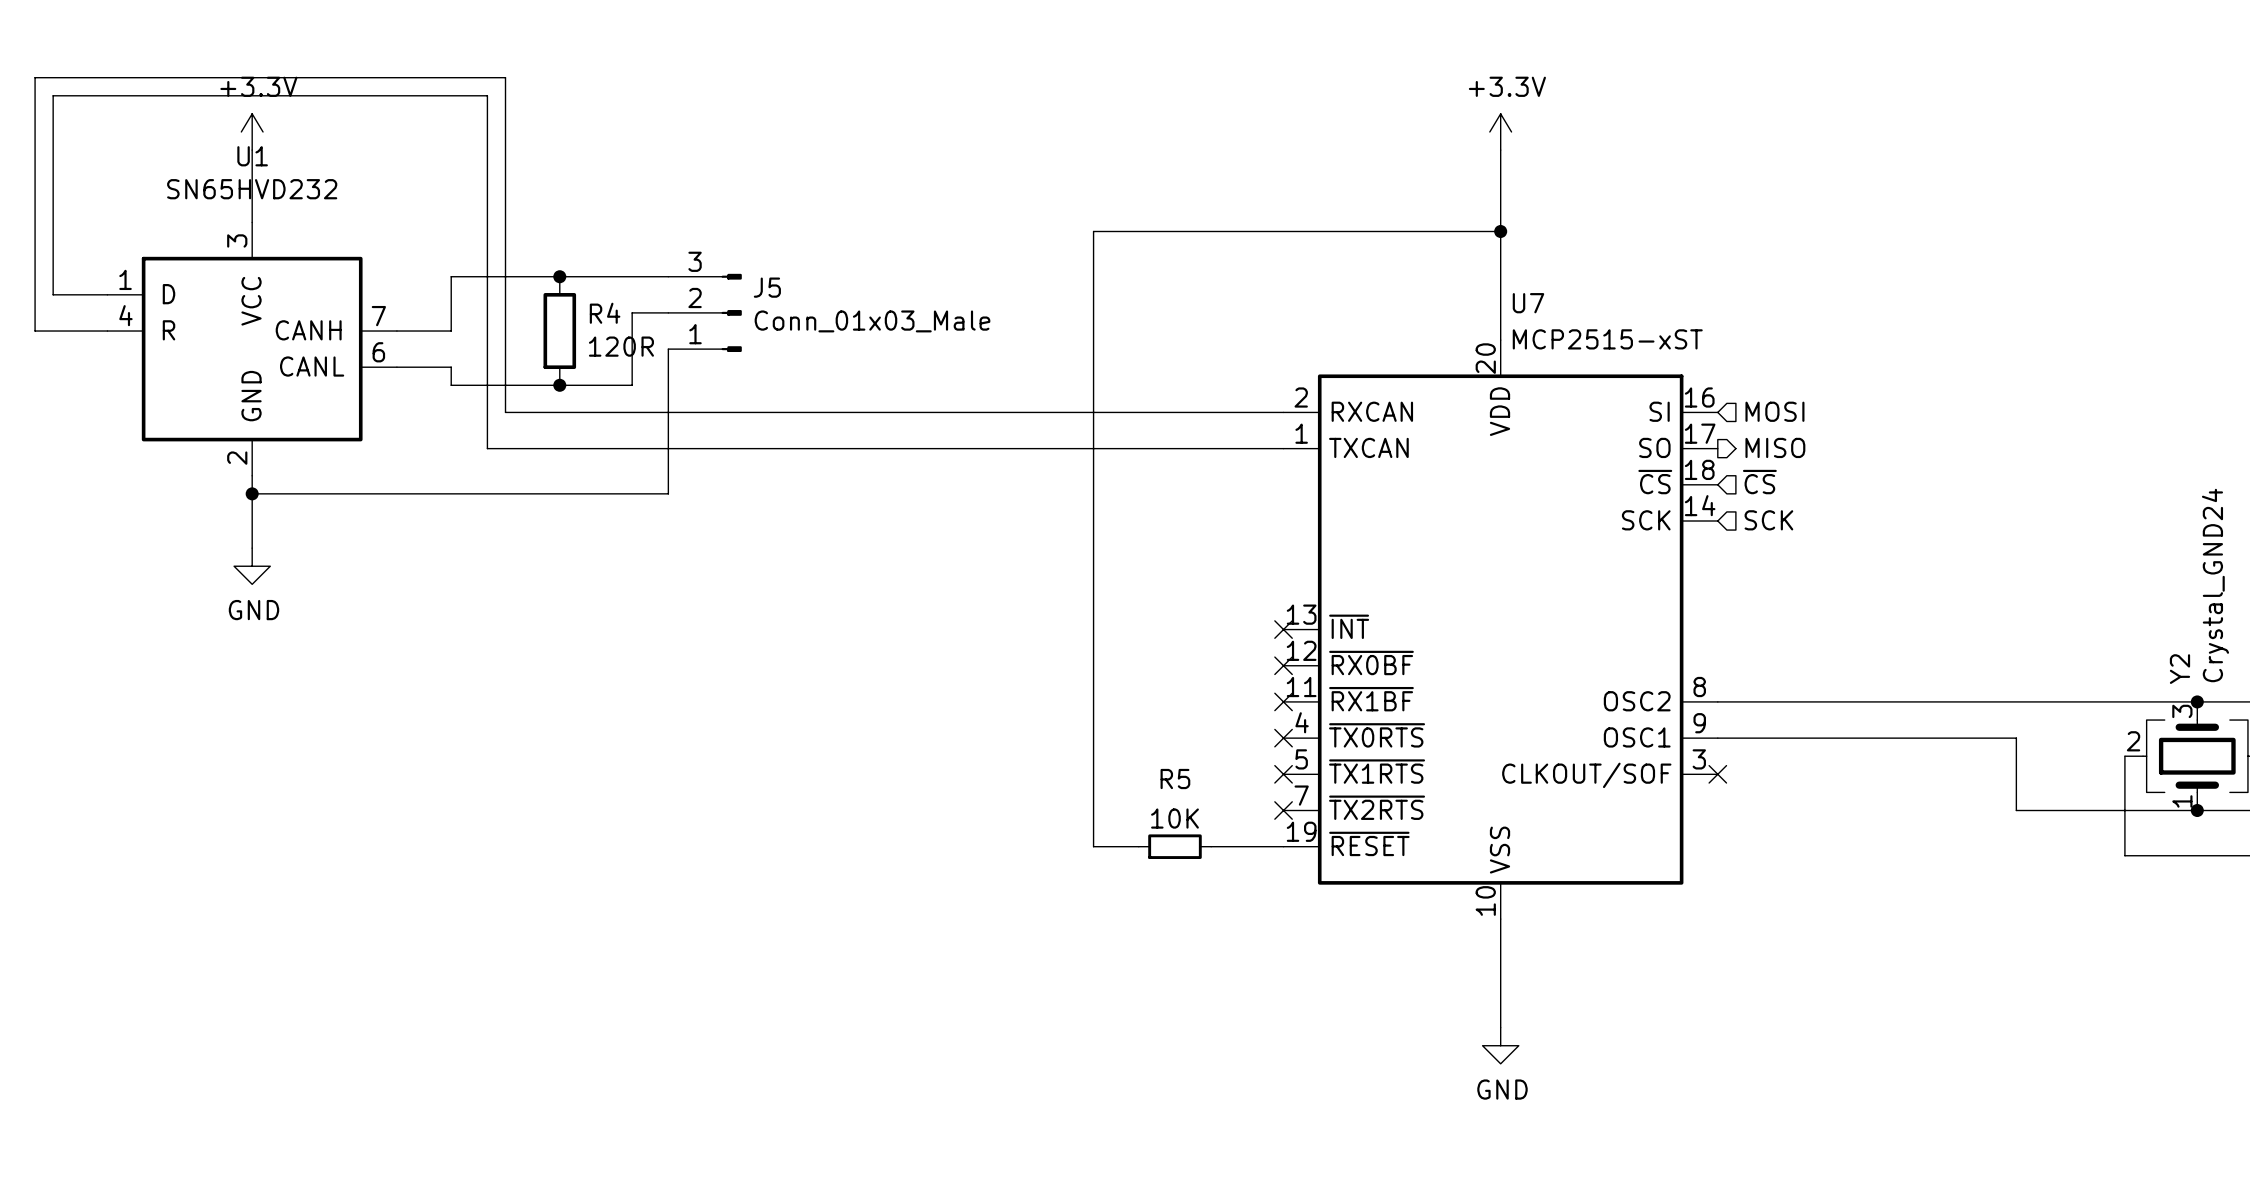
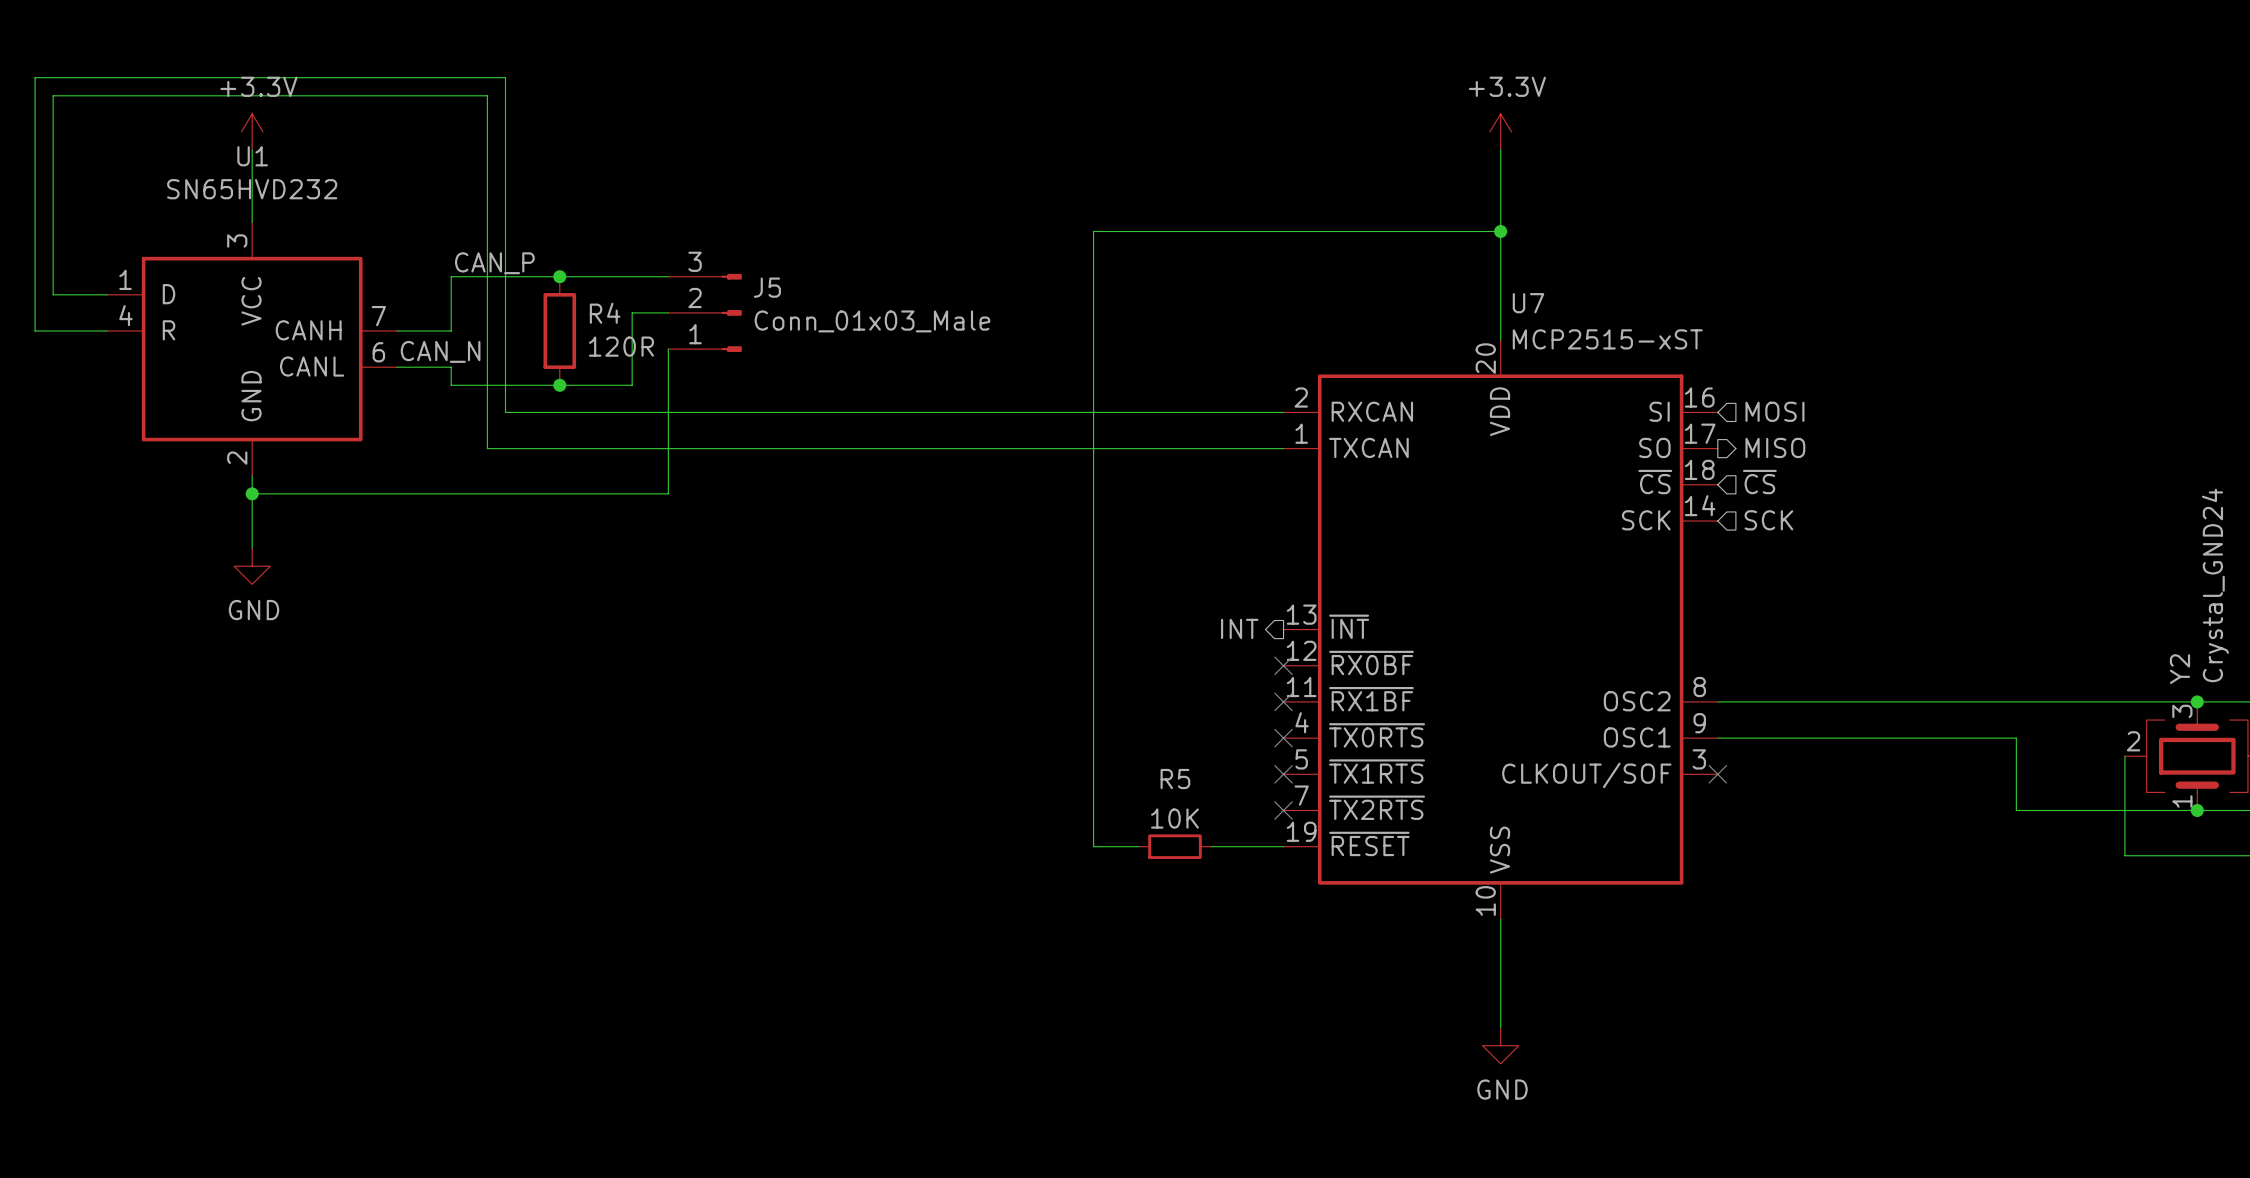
label: none -> CAN_P (494, 263)
label: none -> CAN_N (440, 351)
hierarchical label: none -> INT (1239, 628)
no-connect mark: (1283, 629) -> none

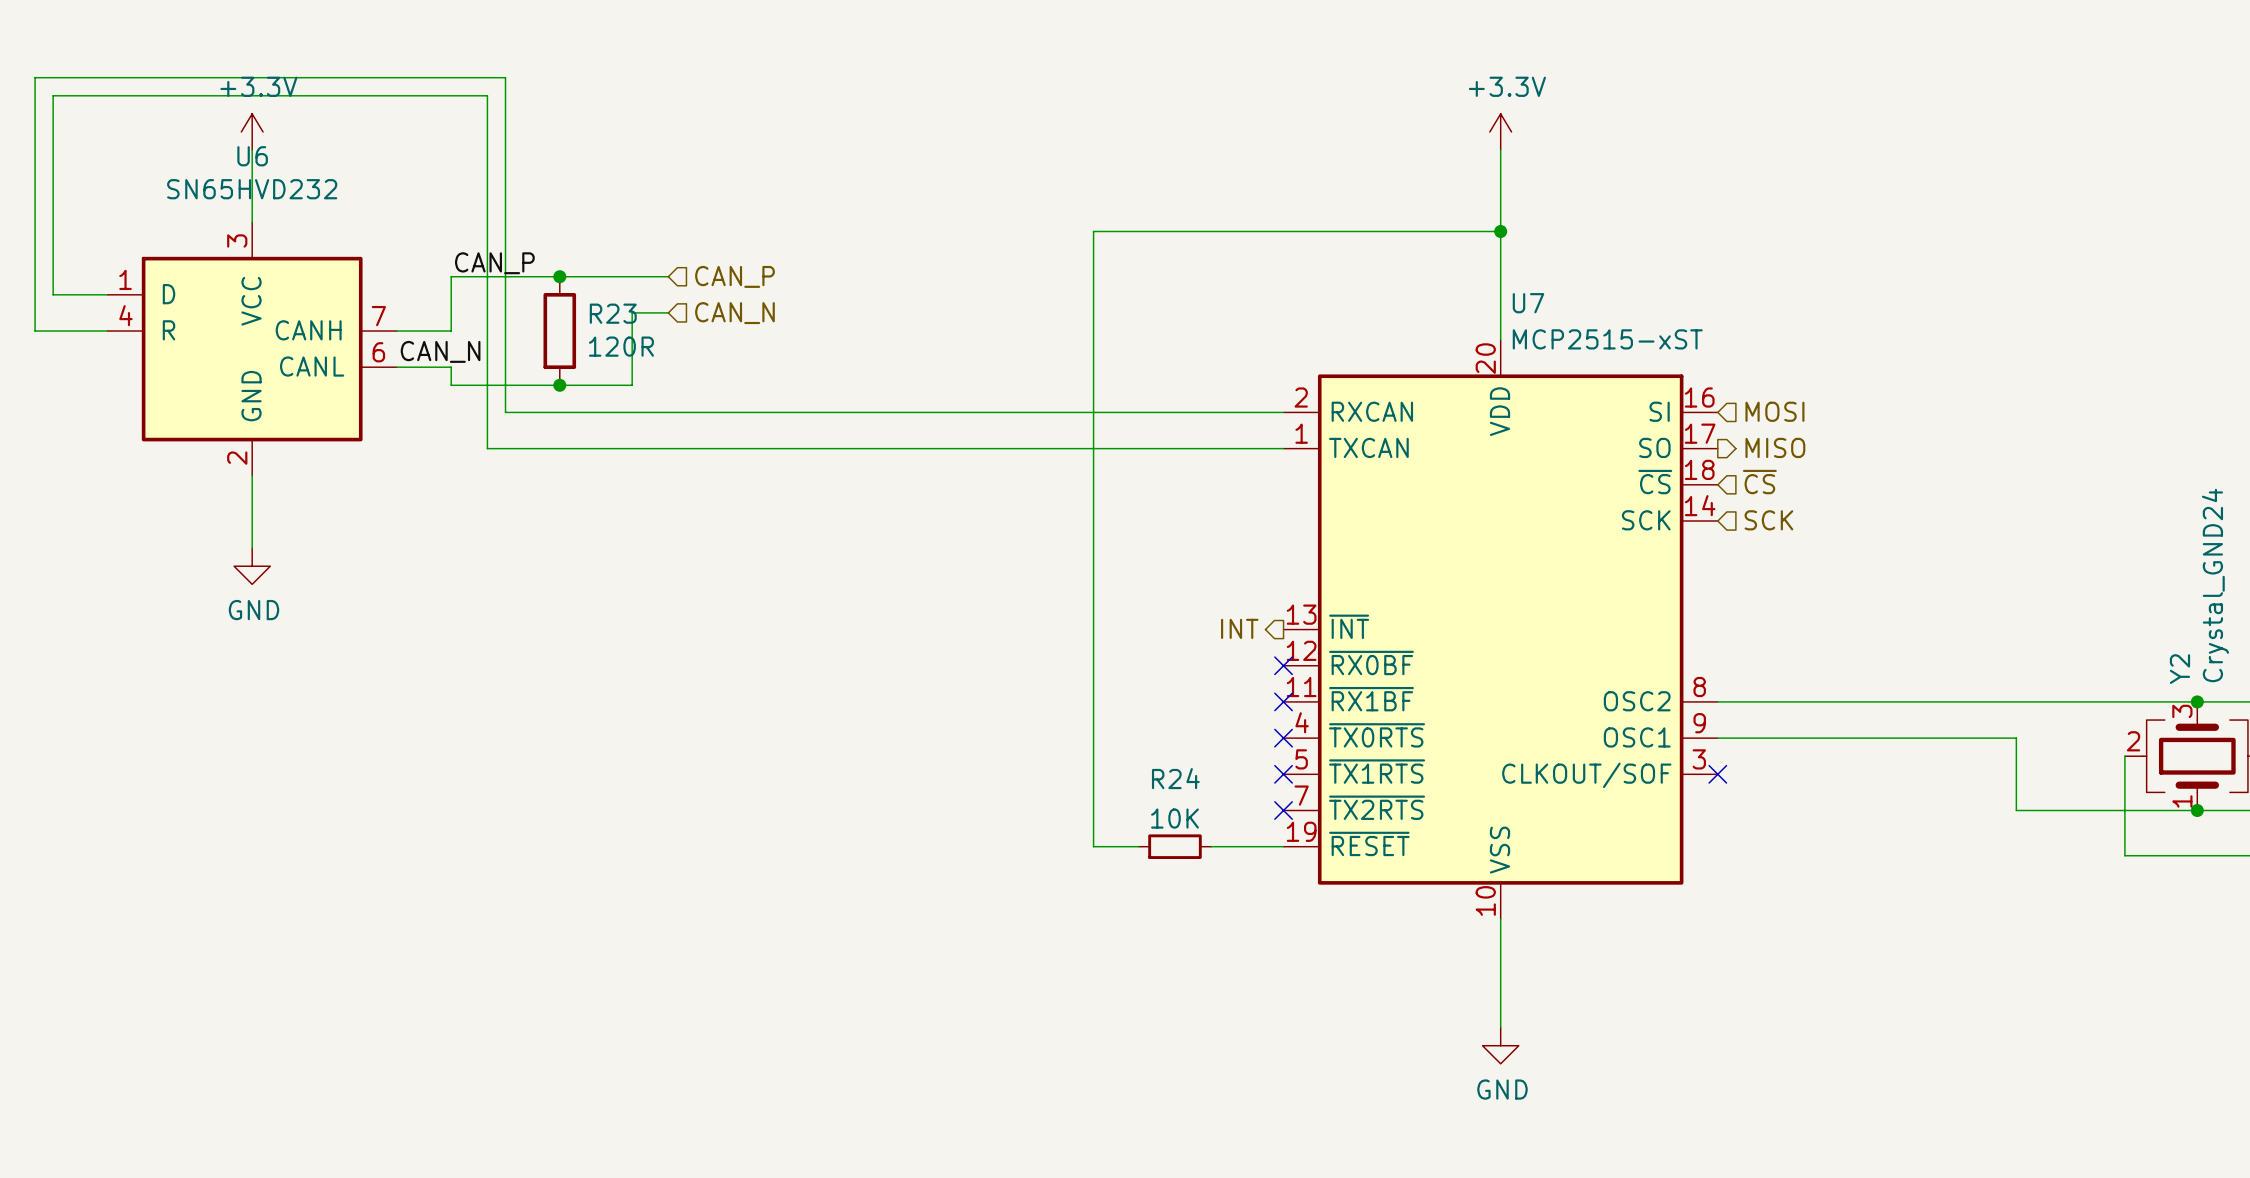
U1 name: U1 (252, 156) -> U6 (252, 156)
hierarchical label: none -> CAN_P (734, 276)
J5: Conn_01x03_Male (705, 312) -> none
R4 name: R4 (605, 313) -> R23 (613, 313)
hierarchical label: none -> CAN_N (734, 313)
wire: (668, 349) (668, 493) (252, 493) -> none
junction: (252, 493) -> none
R5 name: R5 (1175, 779) -> R24 (1175, 778)

